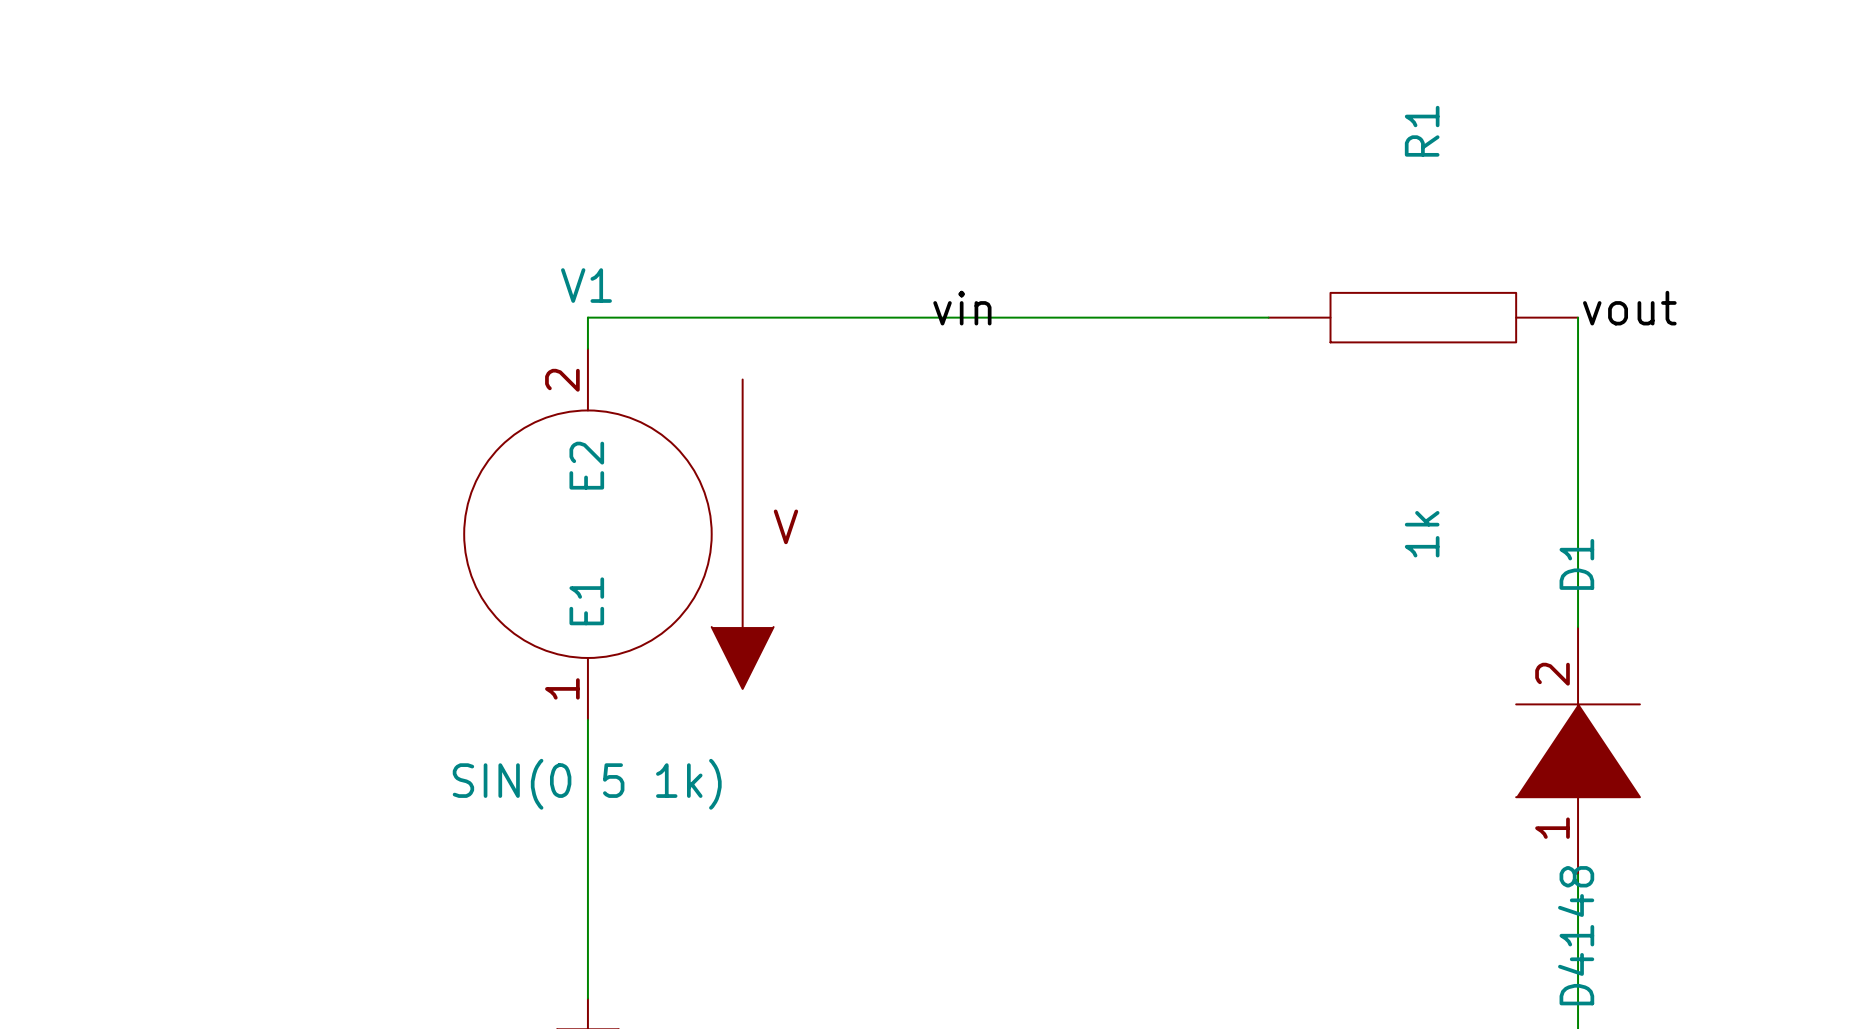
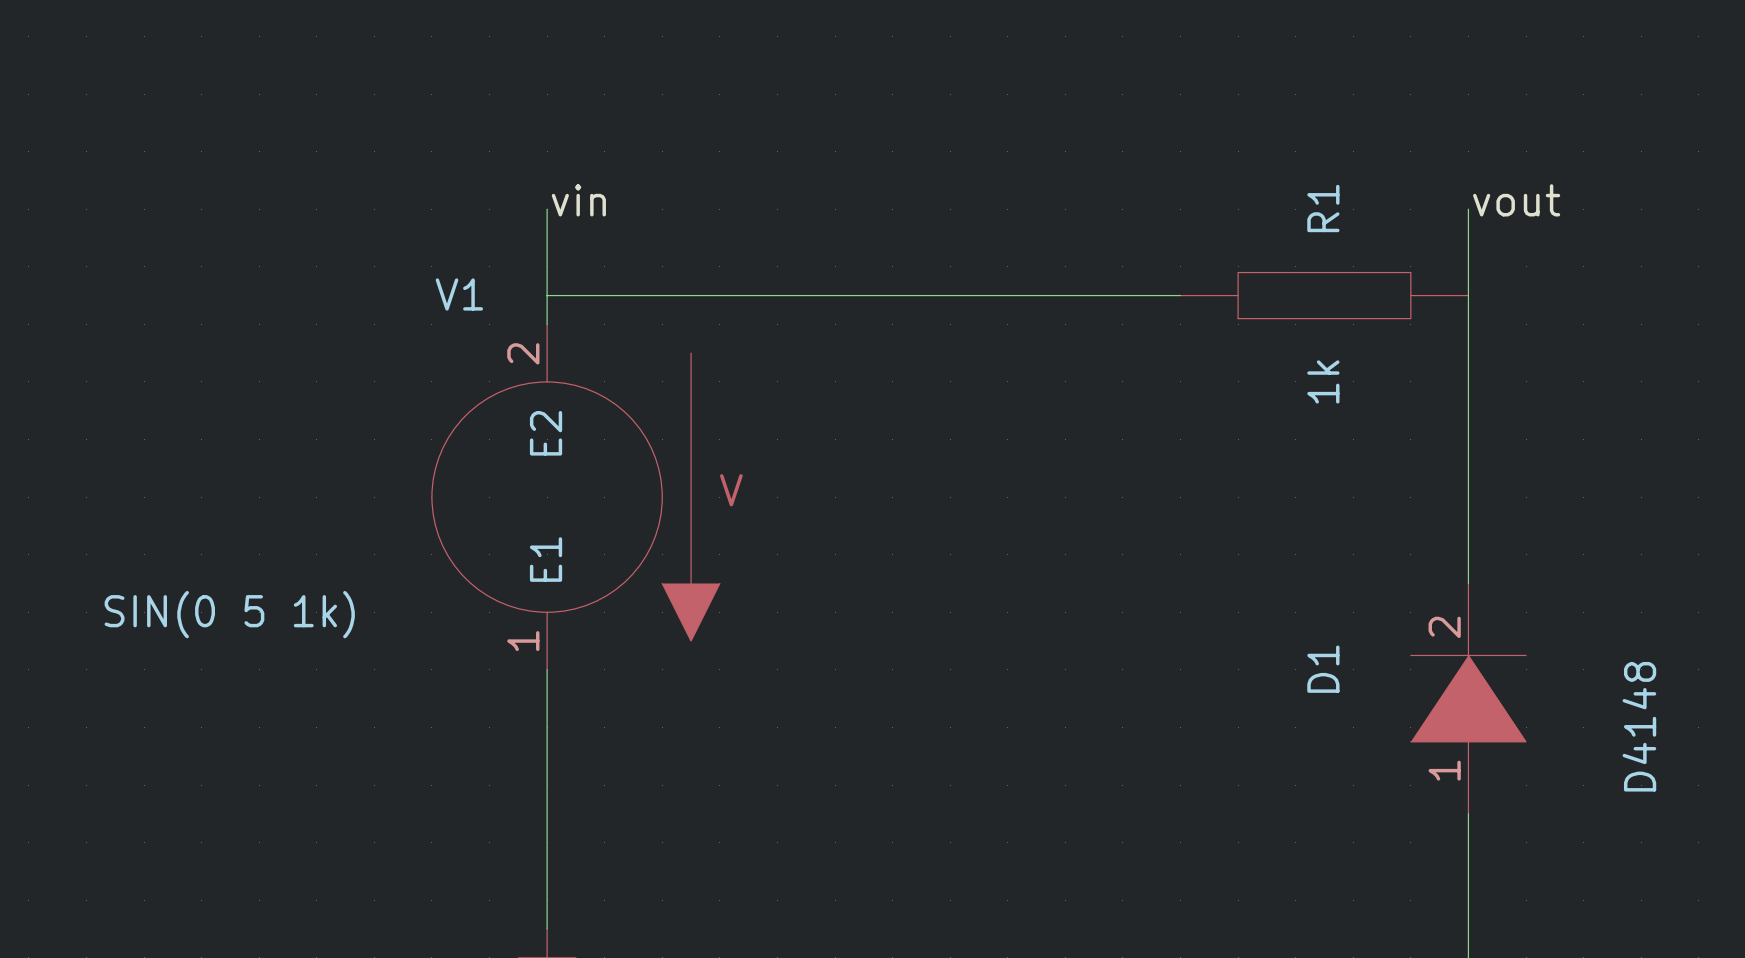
R1 name position: R1 (1422, 131) -> R1 (1323, 208)
wire: none -> (547, 209) (547, 295)
wire: none -> (1468, 209) (1468, 295)
V1 name position: V1 (586, 285) -> V1 (459, 294)
label position: vin (962, 308) -> vin (578, 200)
label position: vout (1629, 308) -> vout (1516, 200)
R1 value position: 1k (1422, 534) -> 1k (1323, 381)
D1 name position: D1 (1576, 564) -> D1 (1323, 669)
V1 value position: SIN(0 5 1k) (587, 784) -> SIN(0 5 1k) (229, 614)
D1 value position: D4148 (1576, 935) -> D4148 (1639, 726)

